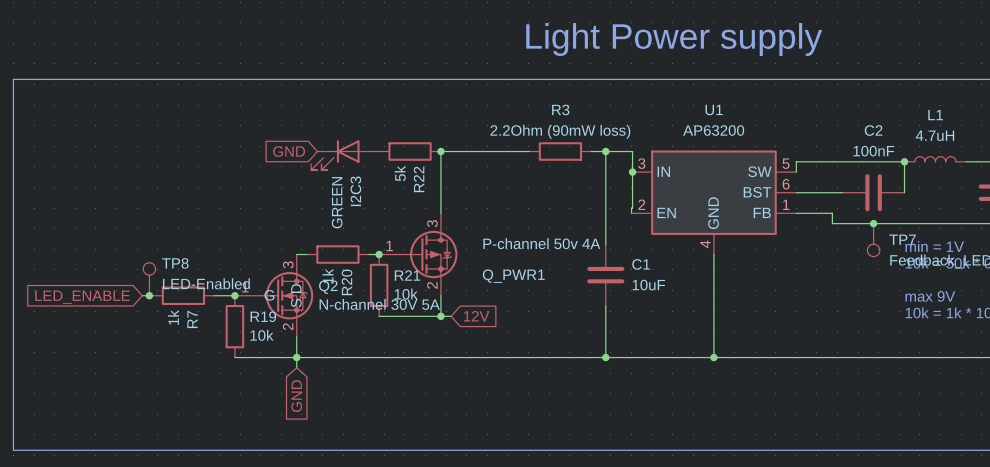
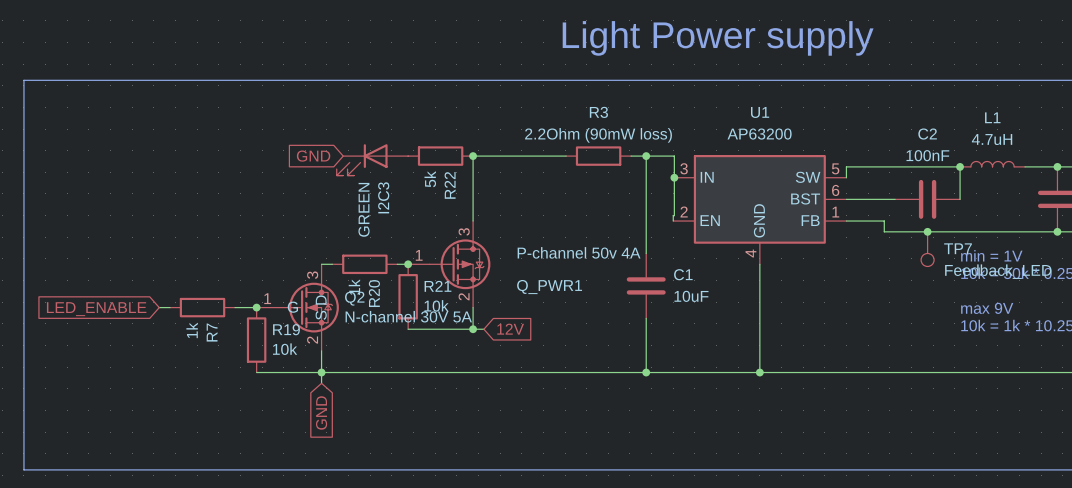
TP8: LED-Enabled (149, 279) -> none
junction: (149, 295) -> none

